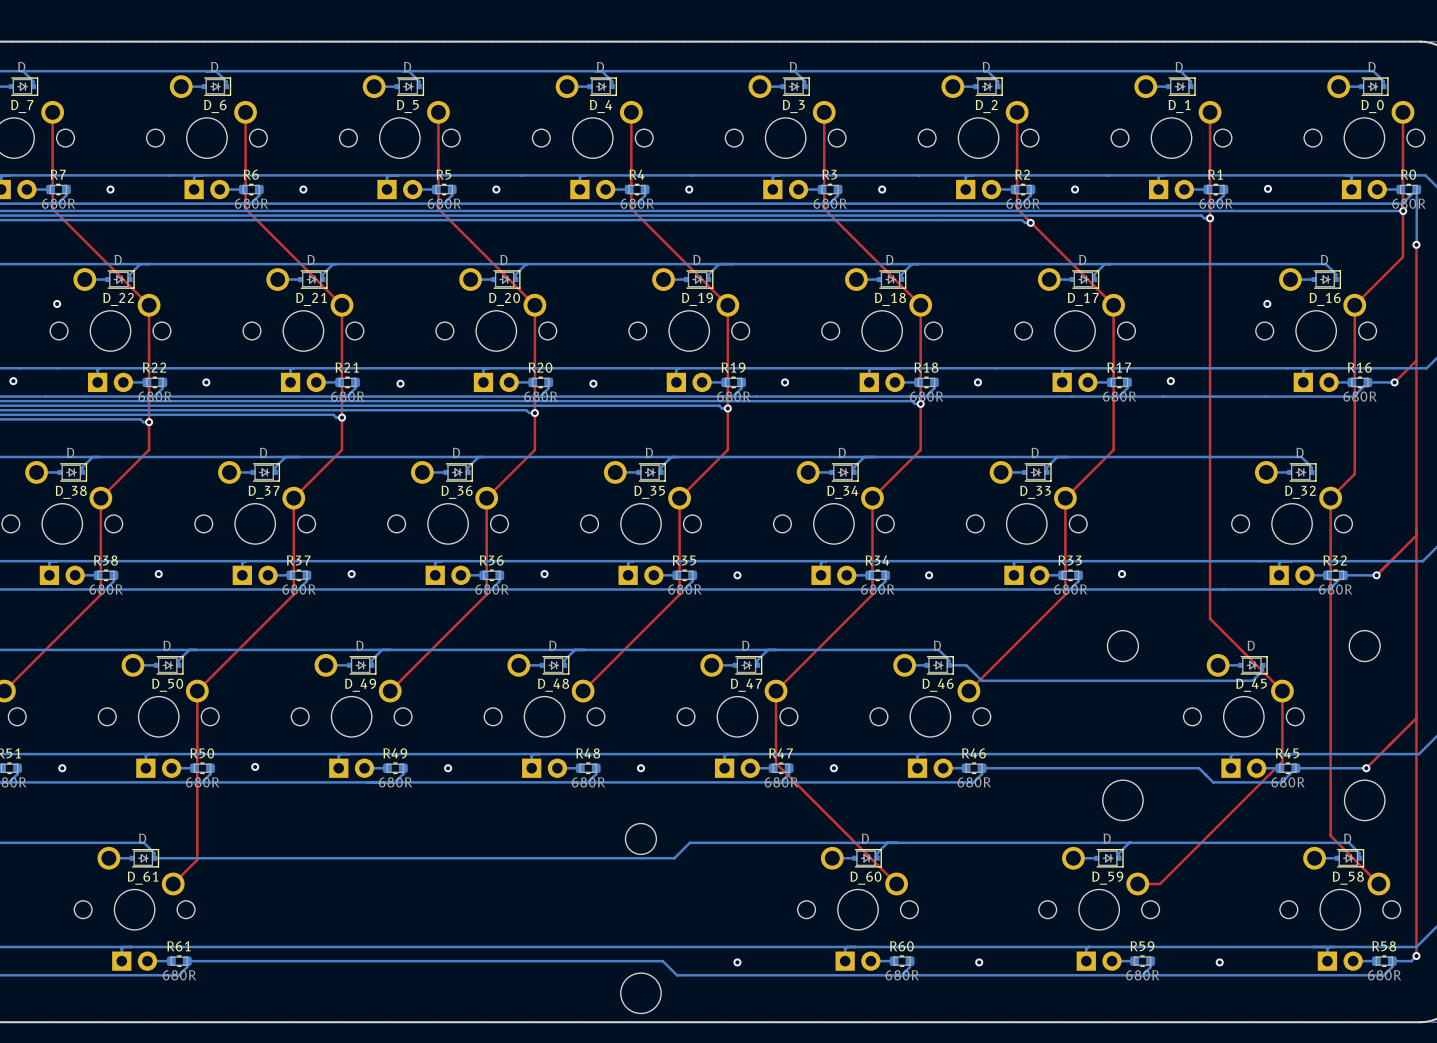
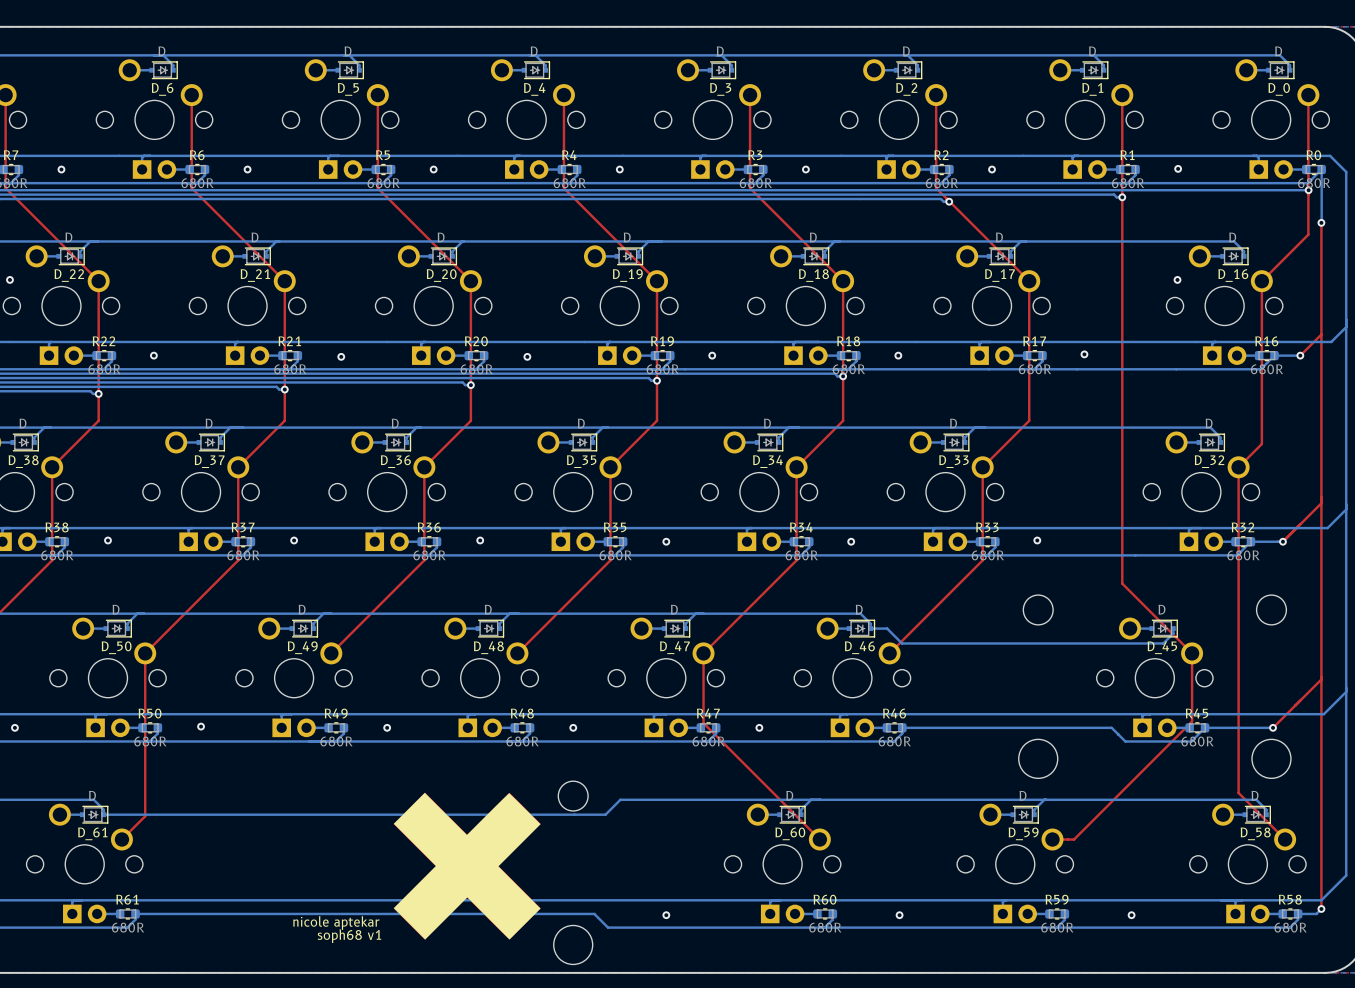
drawing: none -> [393, 792, 541, 940]
text: none -> nicole aptekar (336, 923)
text: none -> soph68 v1 (349, 936)

